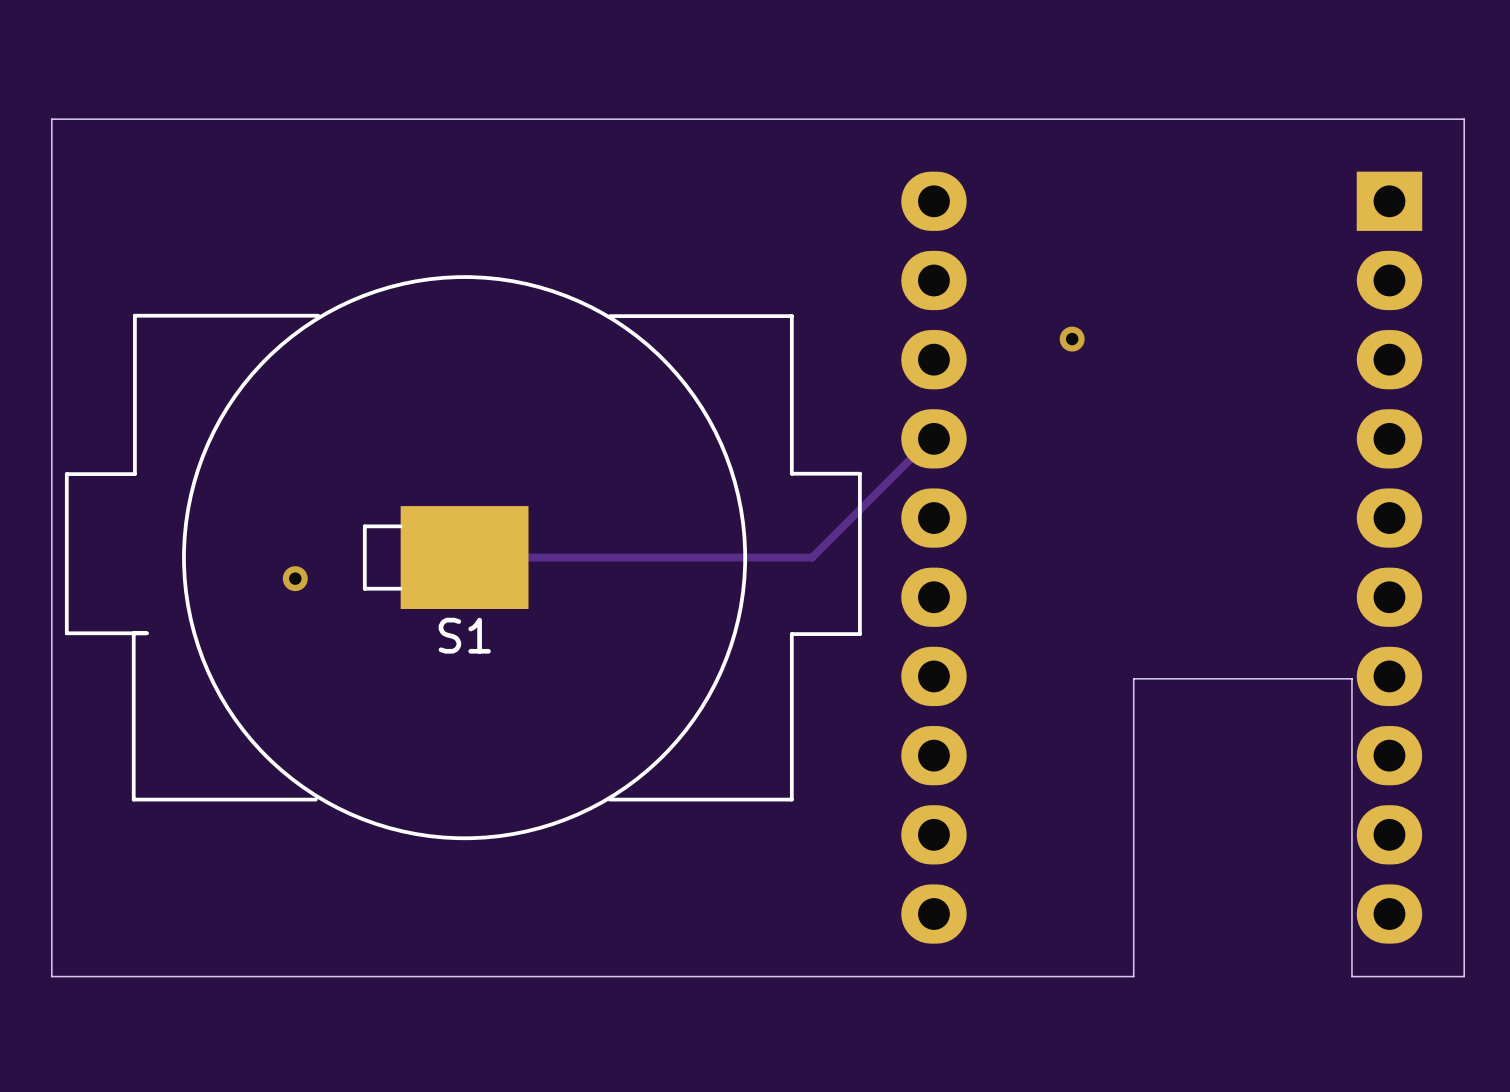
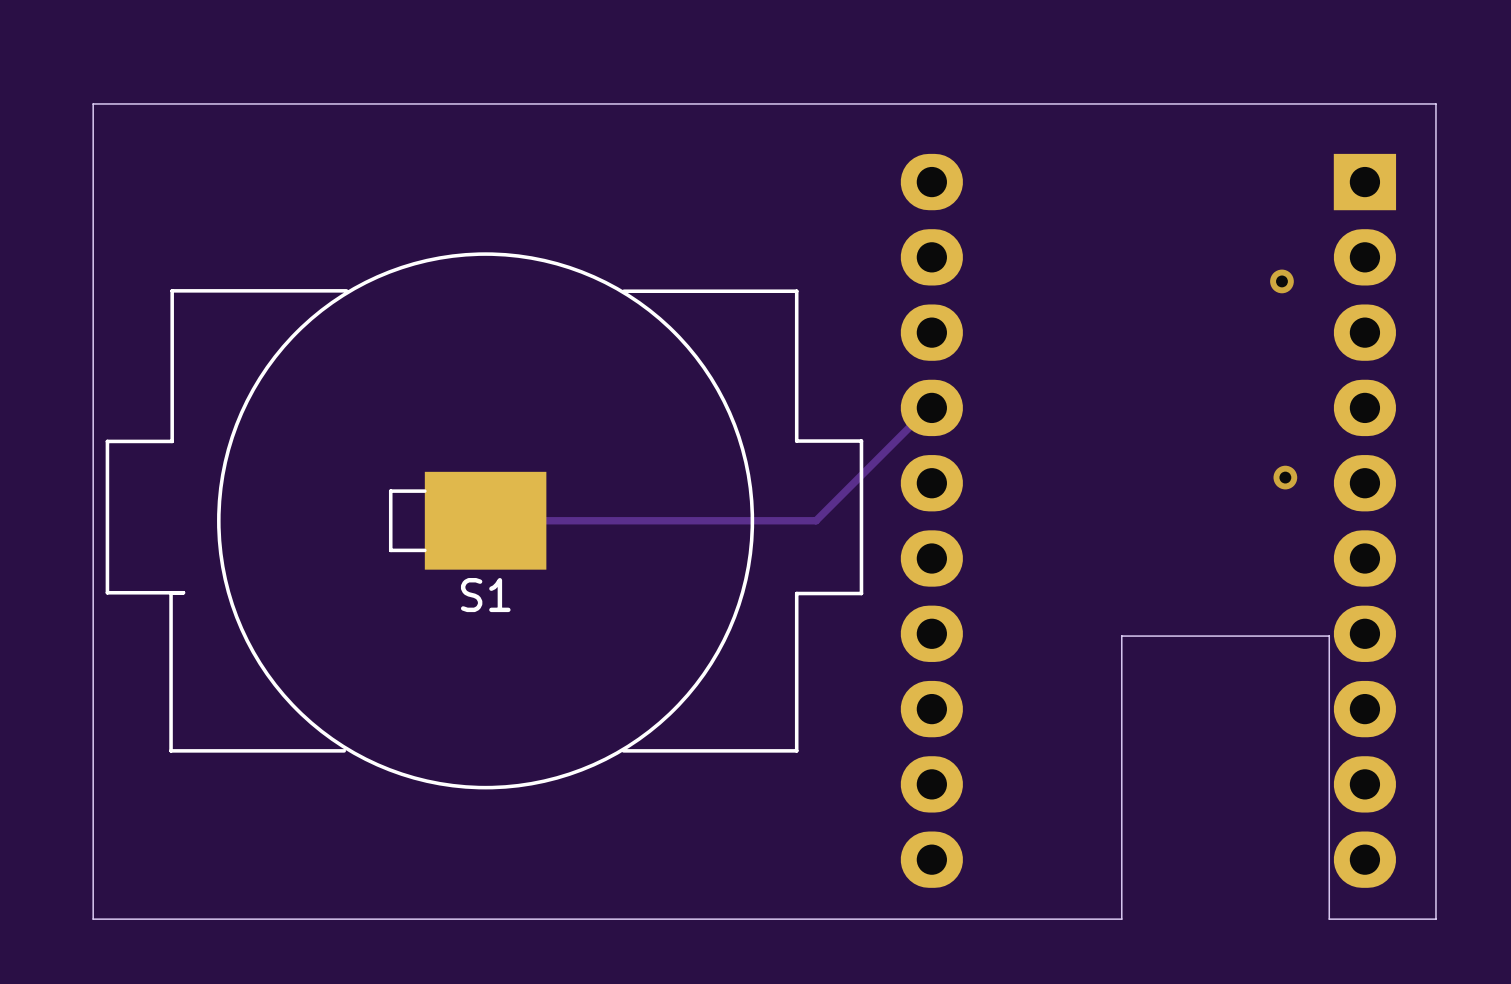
via: none -> (1281, 281)
via: (1072, 339) -> none
via: none -> (1285, 477)
via: (295, 578) -> none

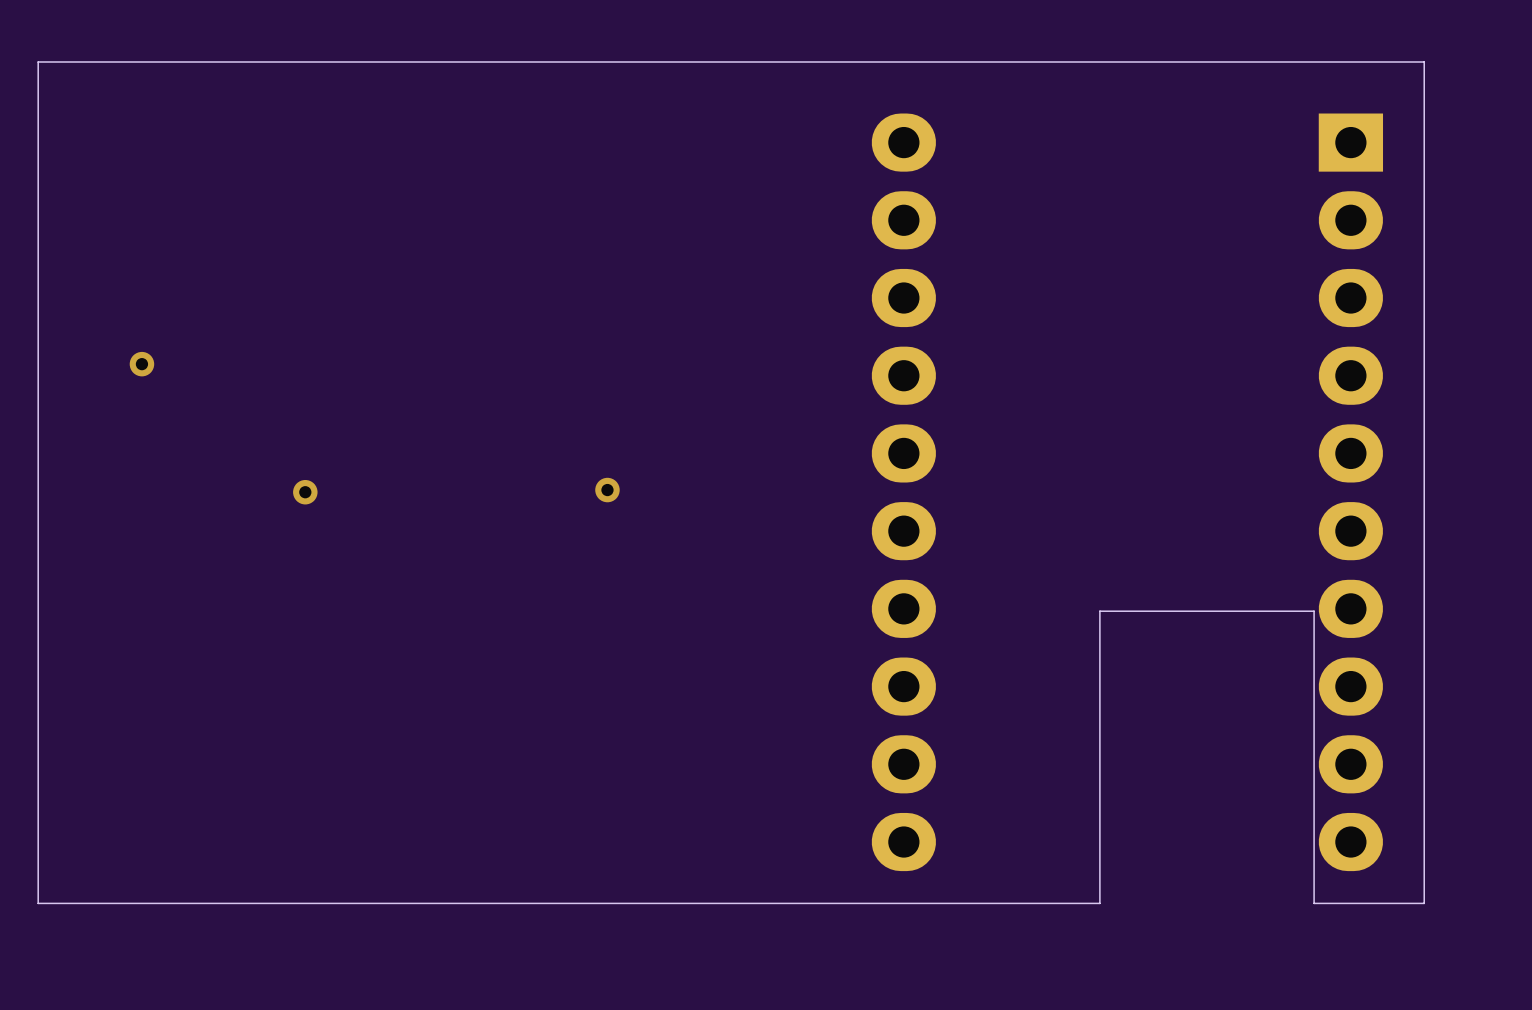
drawing: [217, 252, 755, 790] -> none
via: (1281, 281) -> none
line: (346, 290) (172, 290) (172, 441) (107, 441) (107, 592) (183, 592) -> none
line: (623, 291) (796, 291) (796, 441) (861, 441) (861, 593) (796, 593) (796, 750) (623, 750) -> none
via: none -> (141, 364)
track: (931, 407) (928, 407) (816, 520) (485, 520) -> none
via: (1285, 477) -> none
via: none -> (607, 490)
via: none -> (305, 492)
S1: (467, 520) -> none
line: (171, 592) (171, 750) (344, 750) -> none

